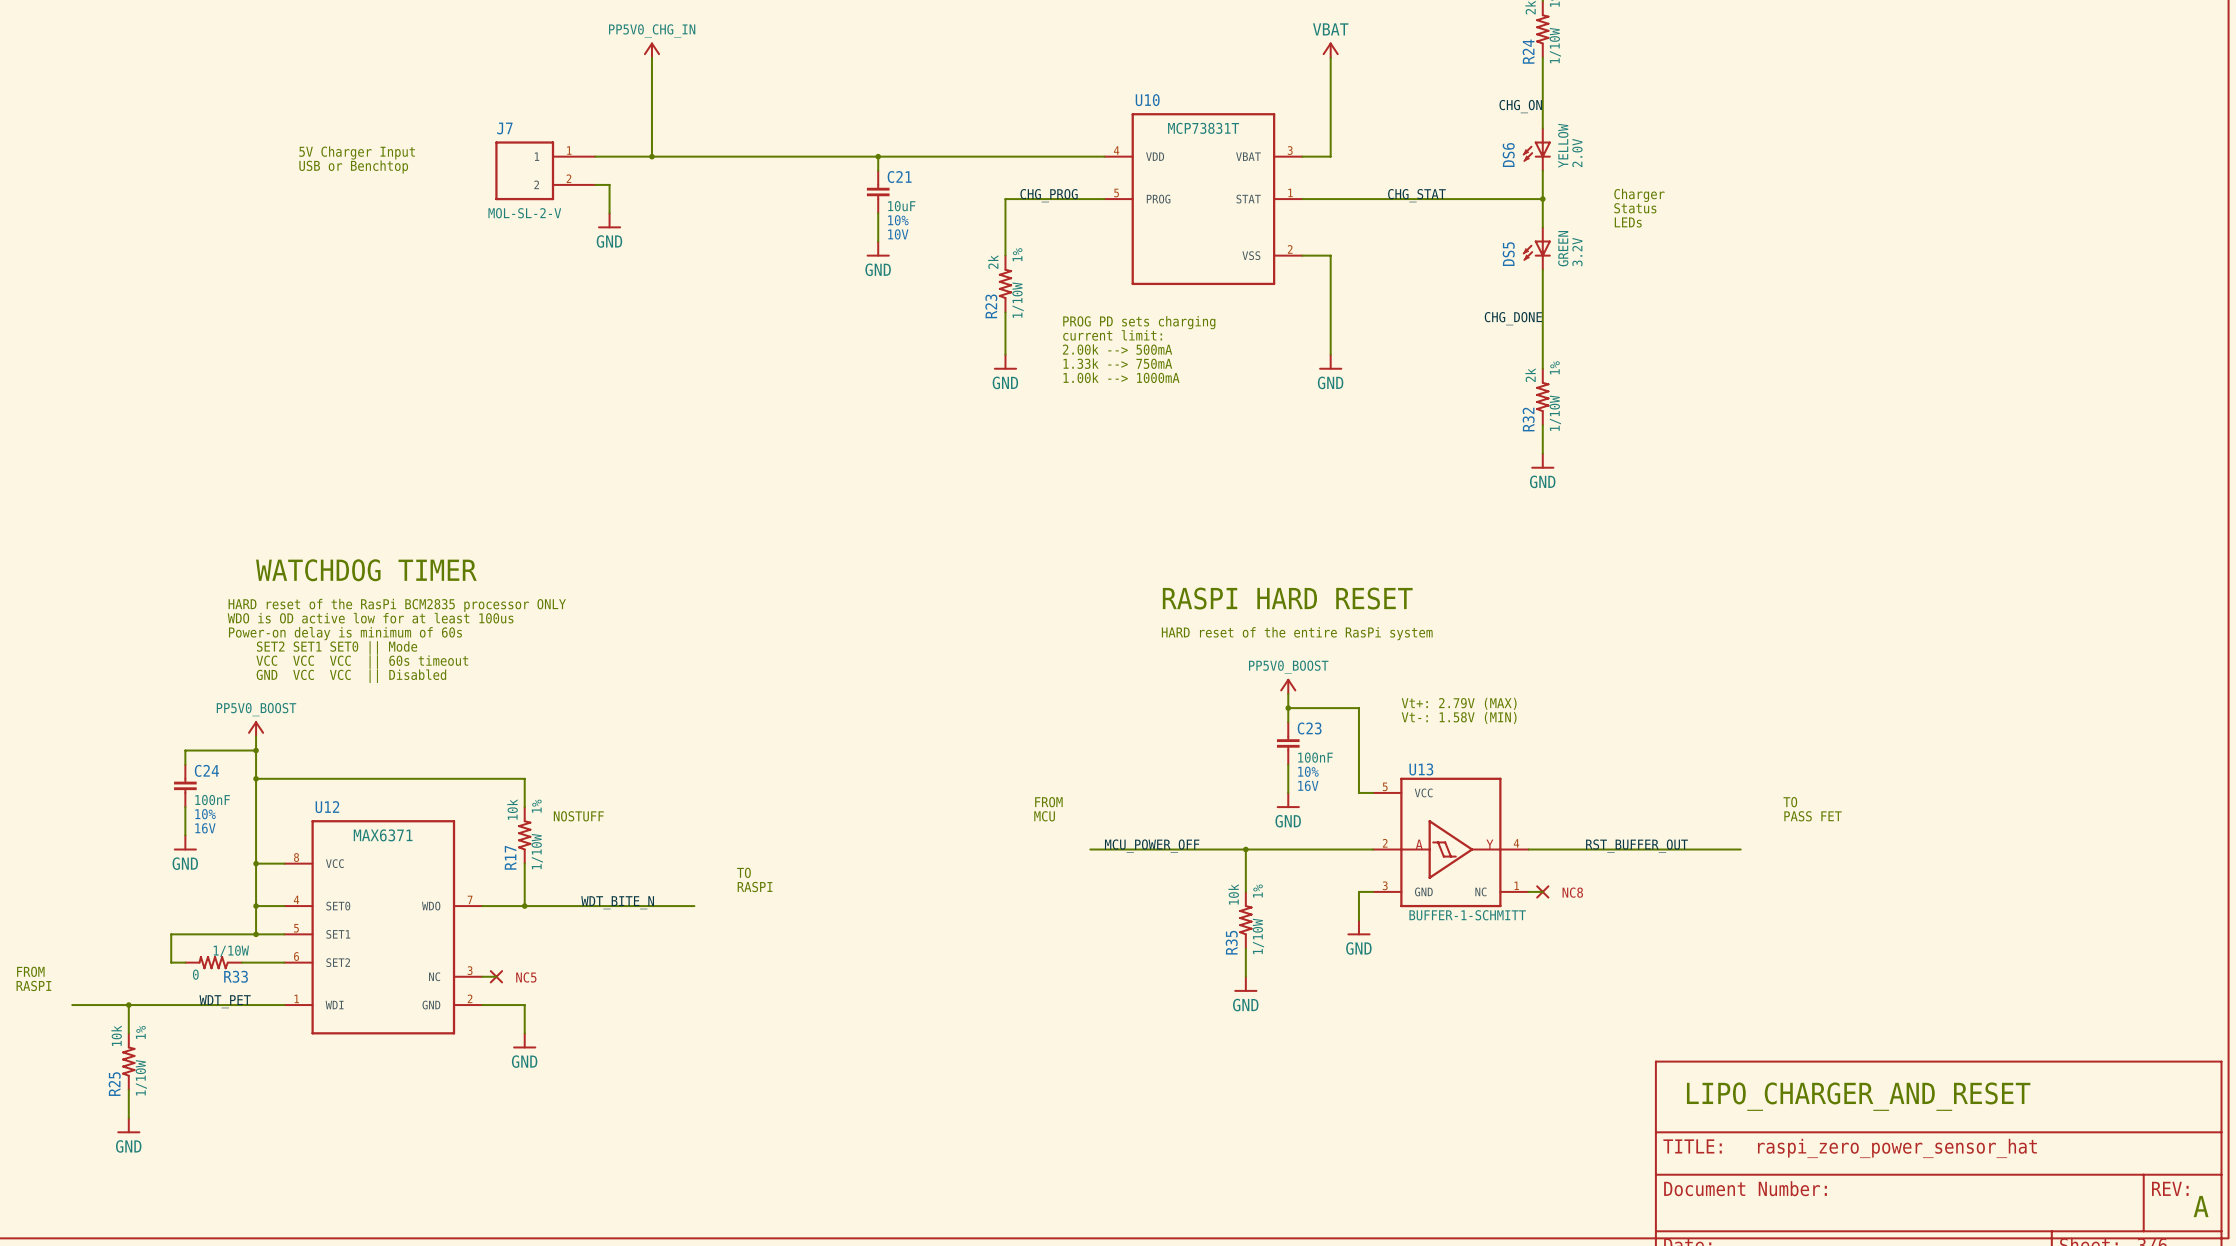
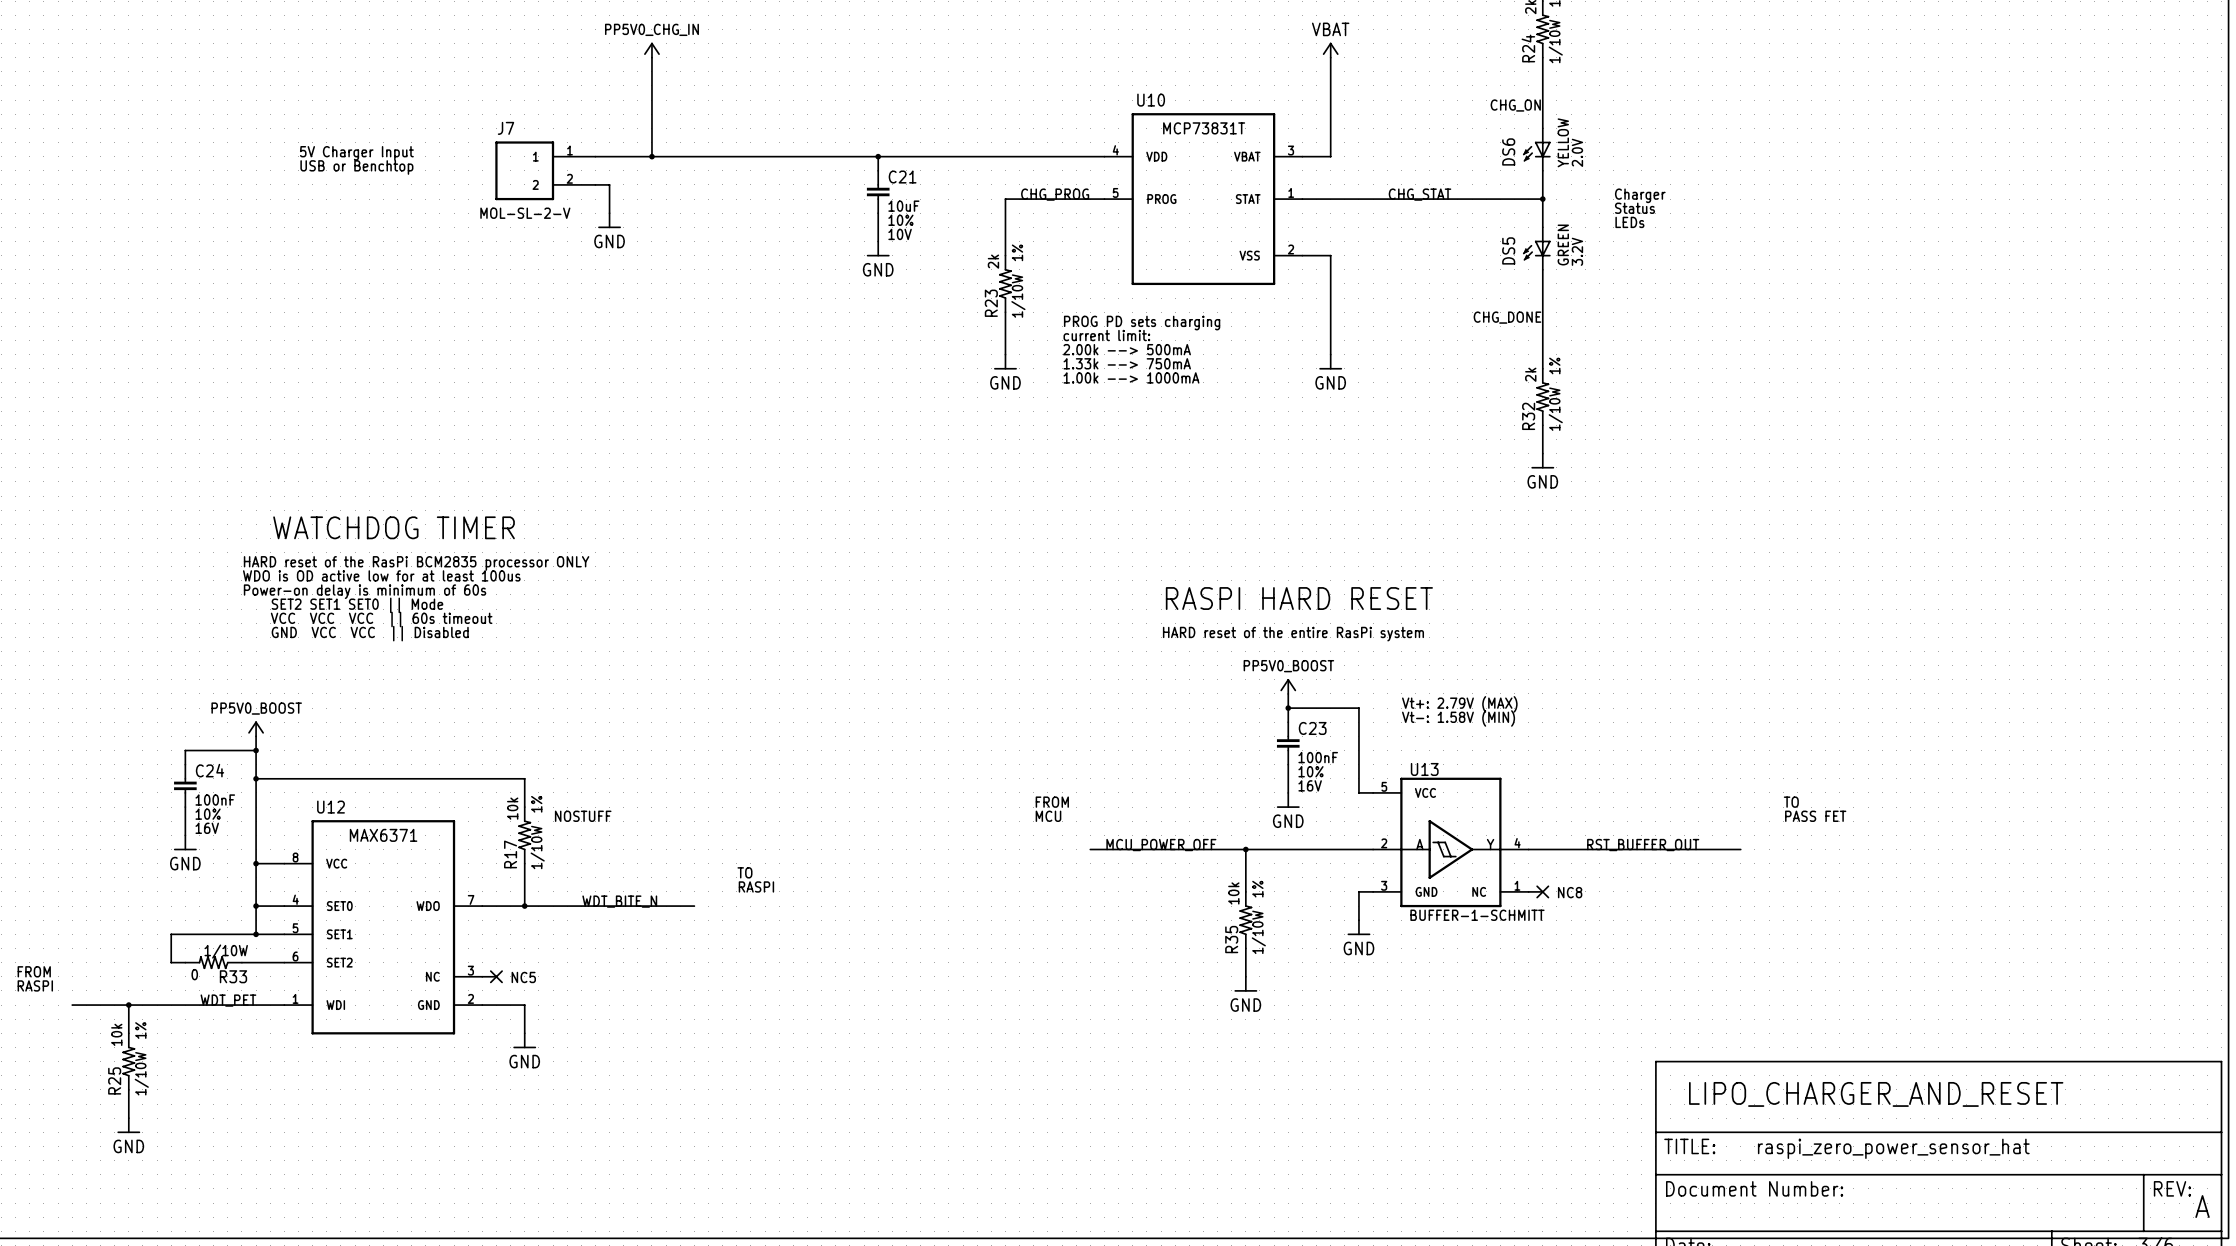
text position: WATCHDOG TIMER (366, 570) -> WATCHDOG TIMER (394, 527)
text position: HARD reset of the RasPi BCM2835 processor ONLY (397, 605) -> HARD reset of the RasPi BCM2835 processor ONLY (416, 563)
text position: WDO is OD active low for at least 100us (370, 618) -> WDO is OD active low for at least 100us (381, 575)
text position: Power-on delay is minimum of 60s (345, 633) -> Power-on delay is minimum of 60s (365, 591)
text position: SET2 SET1 SET0 || Mode (337, 647) -> SET2 SET1 SET0 || Mode (357, 605)
text position: VCC VCC VCC || 60s timeout (362, 662) -> VCC VCC VCC || 60s timeout (381, 619)
text position: GND VCC VCC || Disabled (351, 676) -> GND VCC VCC || Disabled (370, 633)

